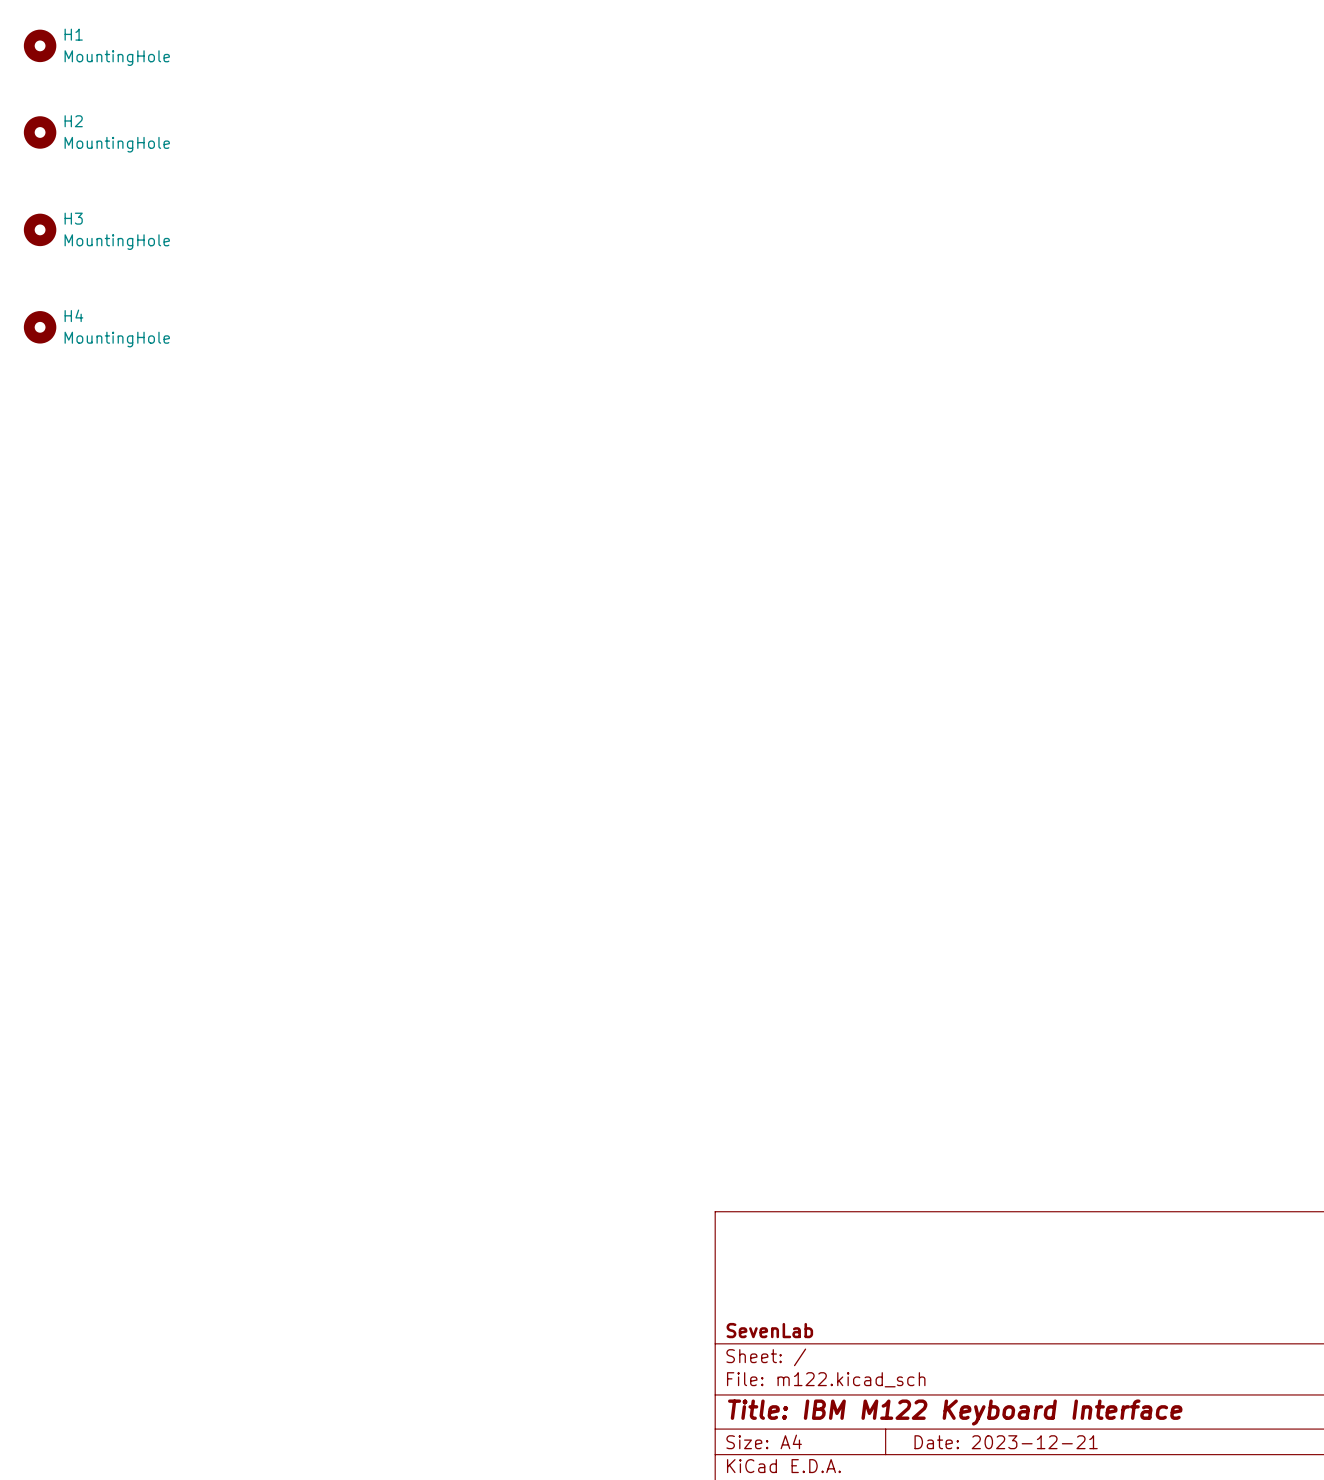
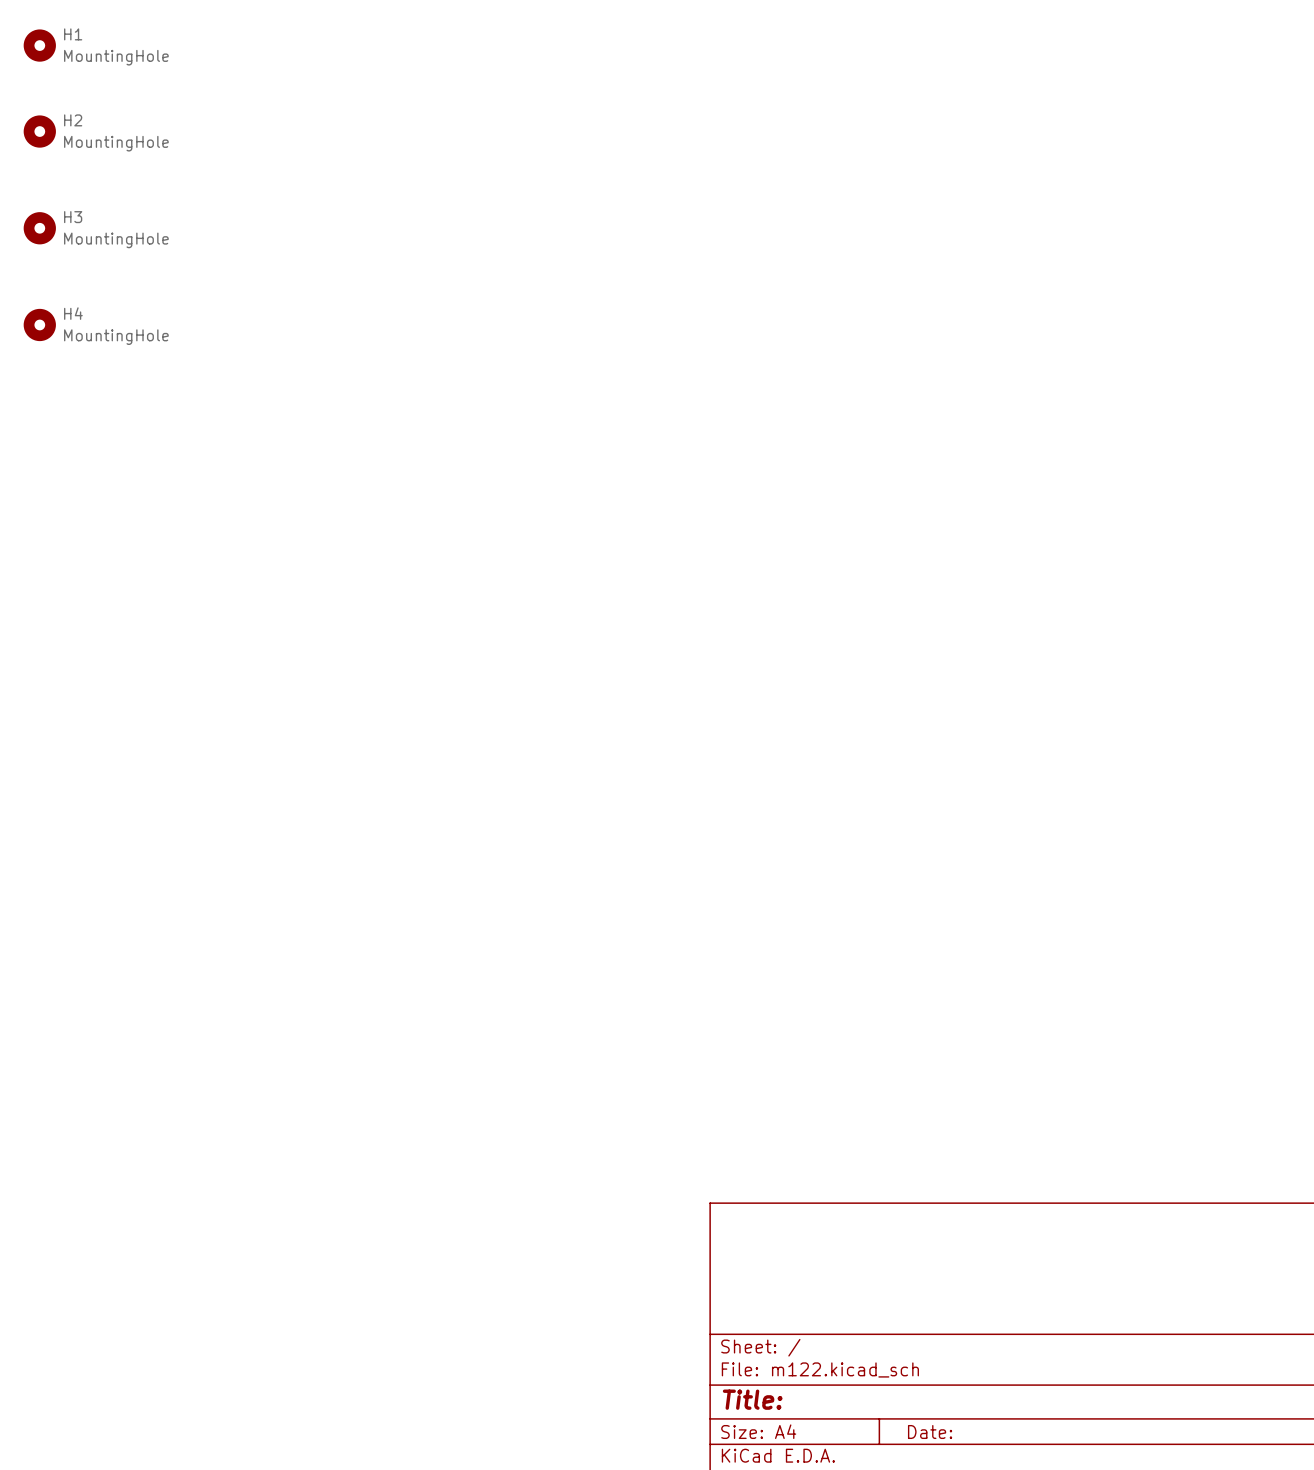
title block: SevenLab (769, 1330) -> none
title block: Title: IBM M122 Keyboard Interface (955, 1412) -> Title: (752, 1399)
title block: Date: 2023-12-21 (1006, 1442) -> Date: (930, 1432)

